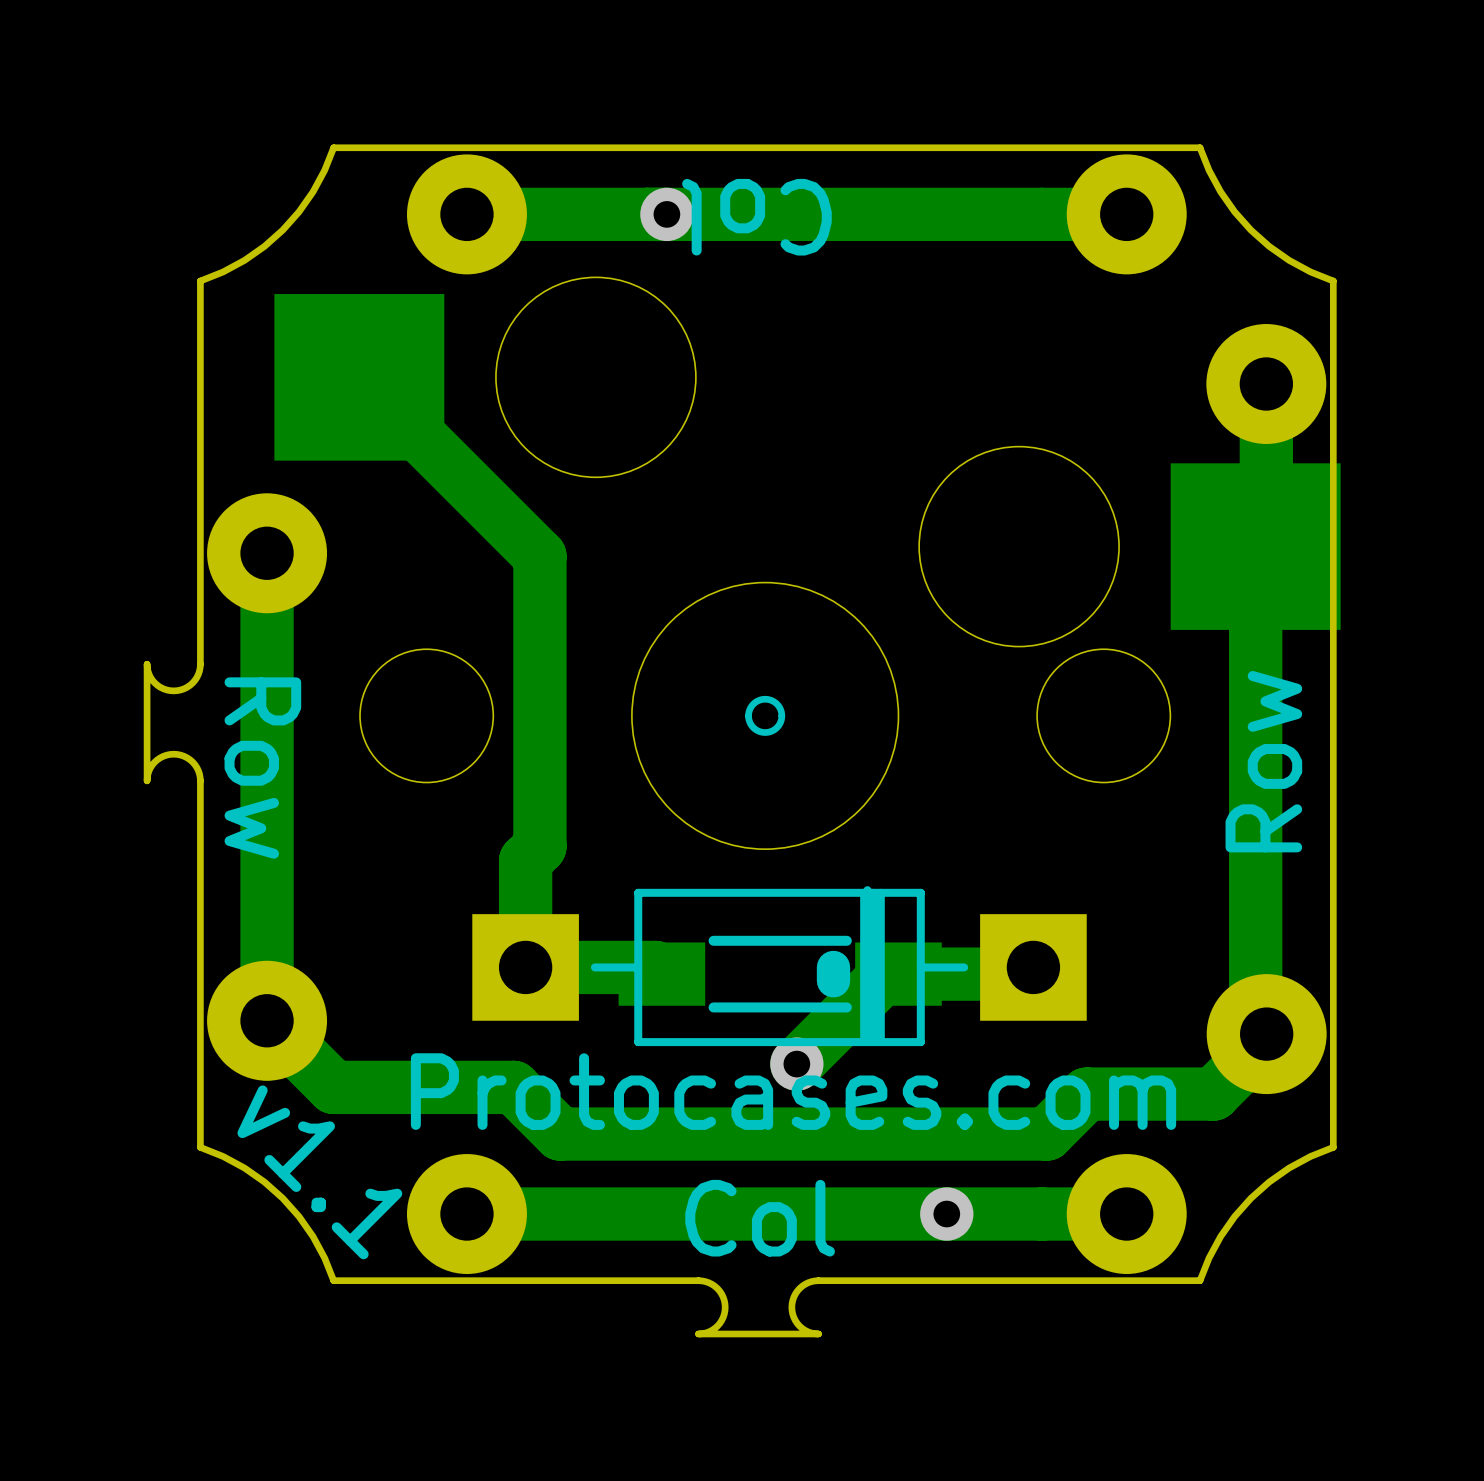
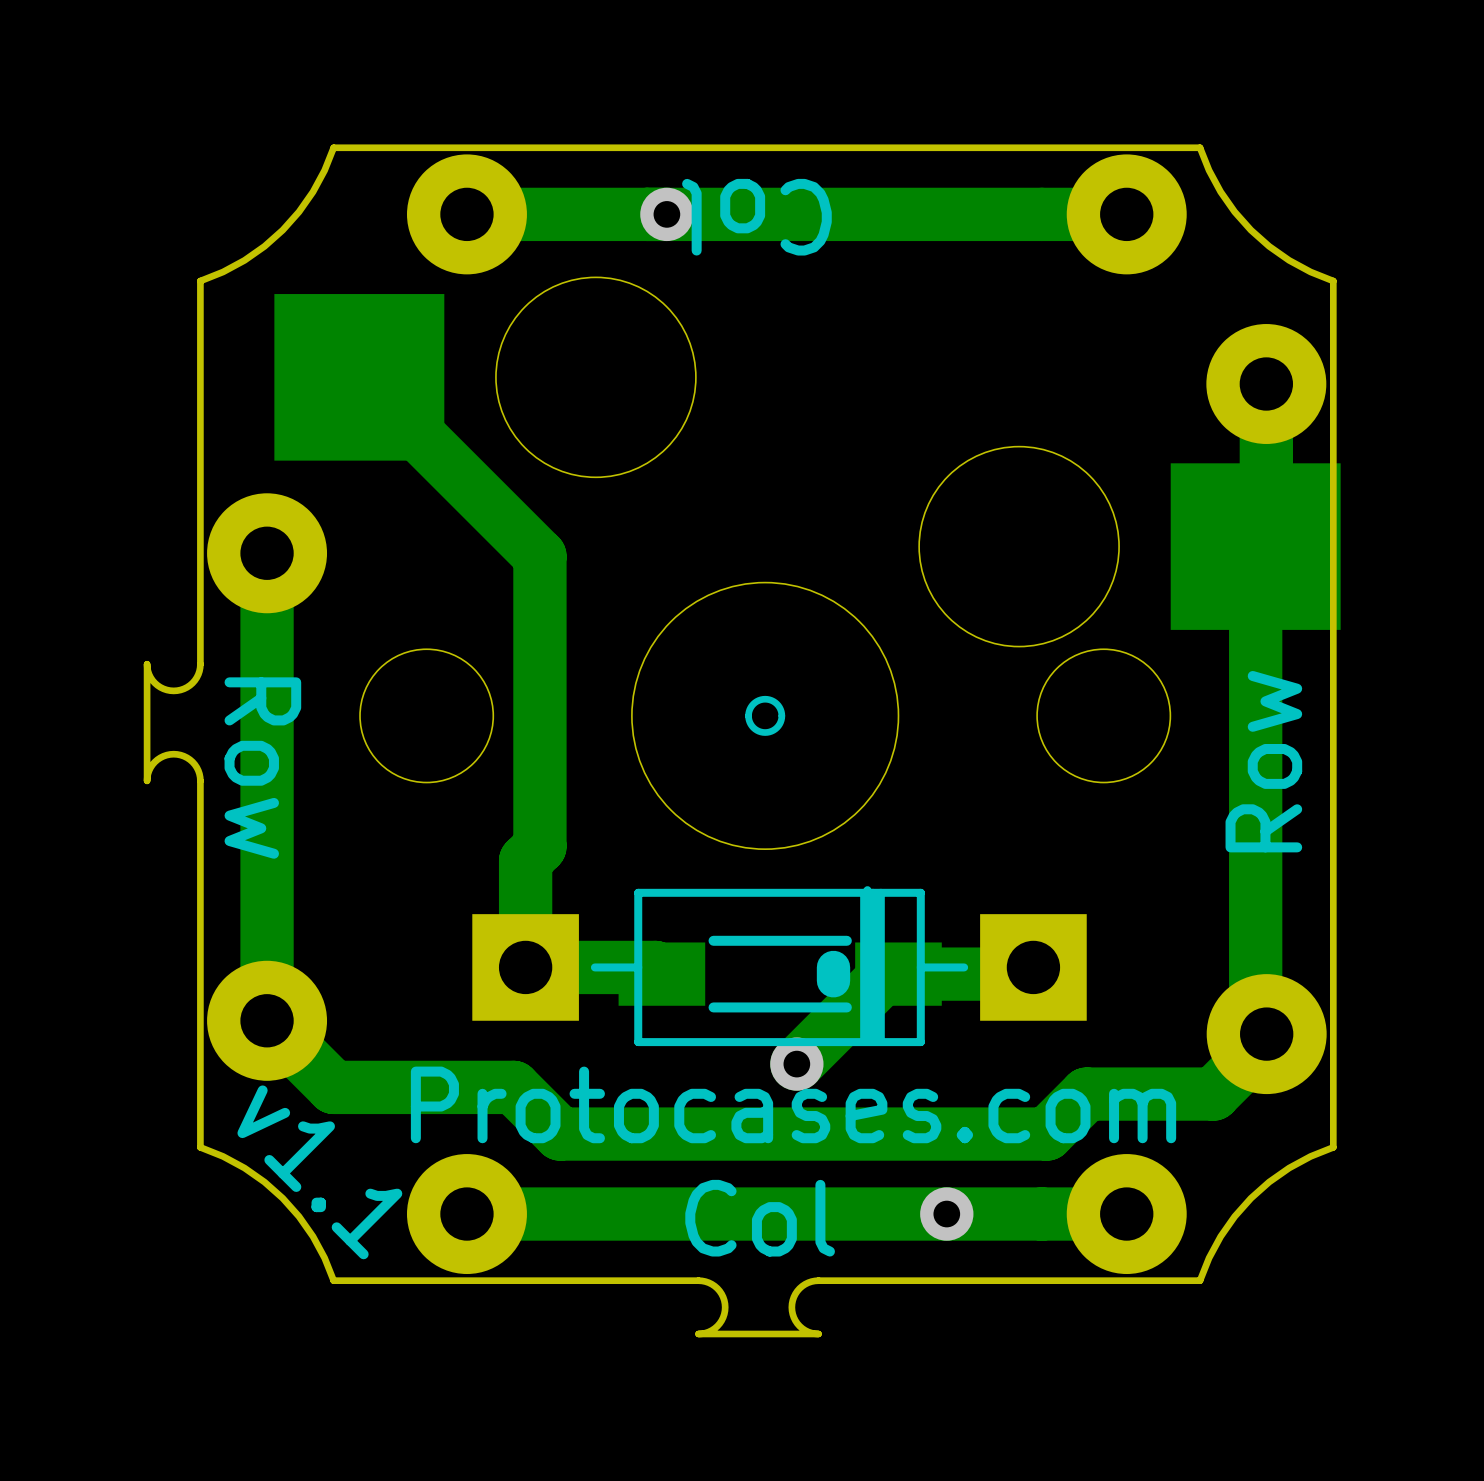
text position: Protocases.com (793, 1091) -> Protocases.com (793, 1104)

